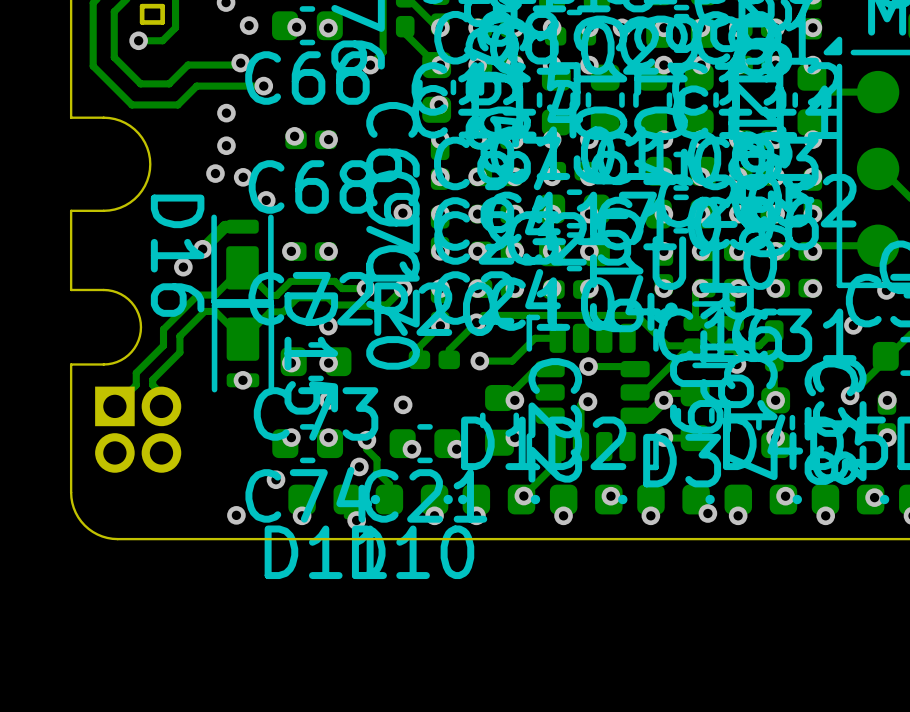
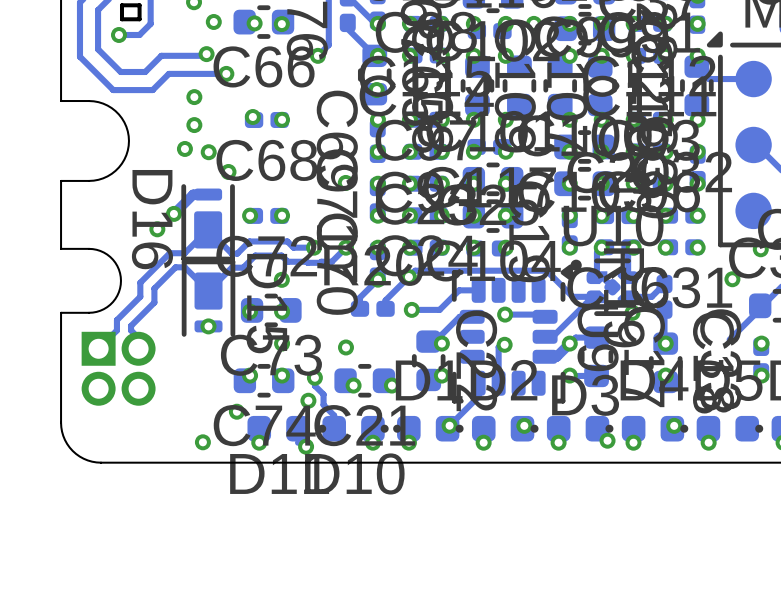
track: (878, 245) (818, 245) (812, 251) -> none
via: (850, 395) -> none
via: (874, 497) -> none

